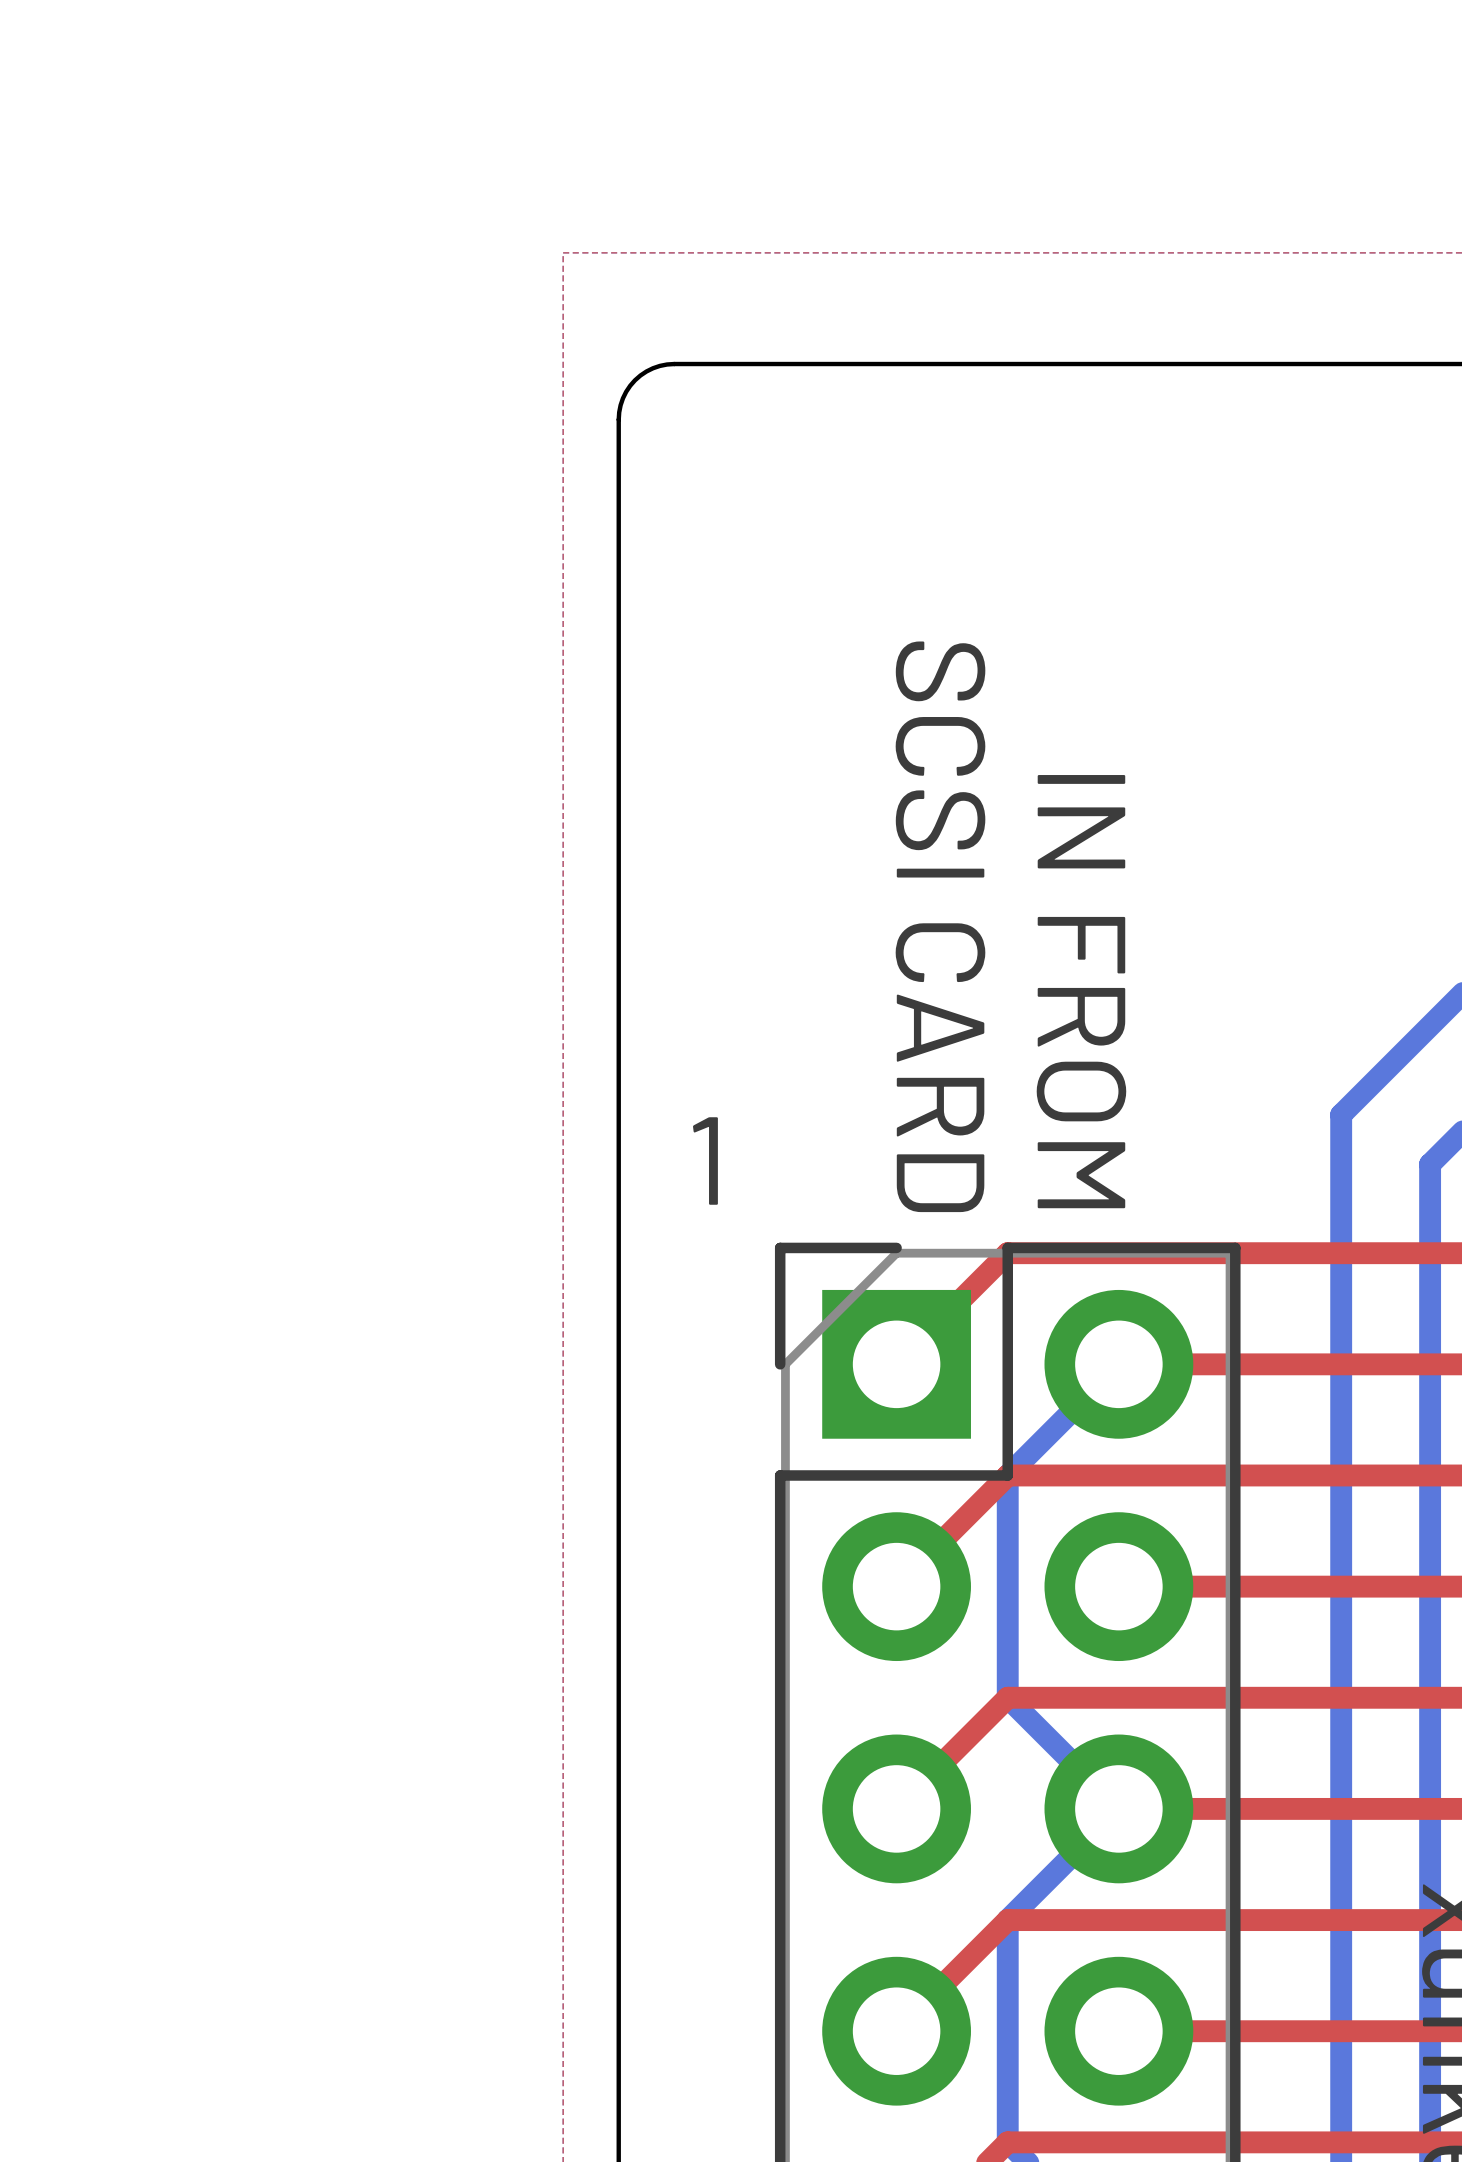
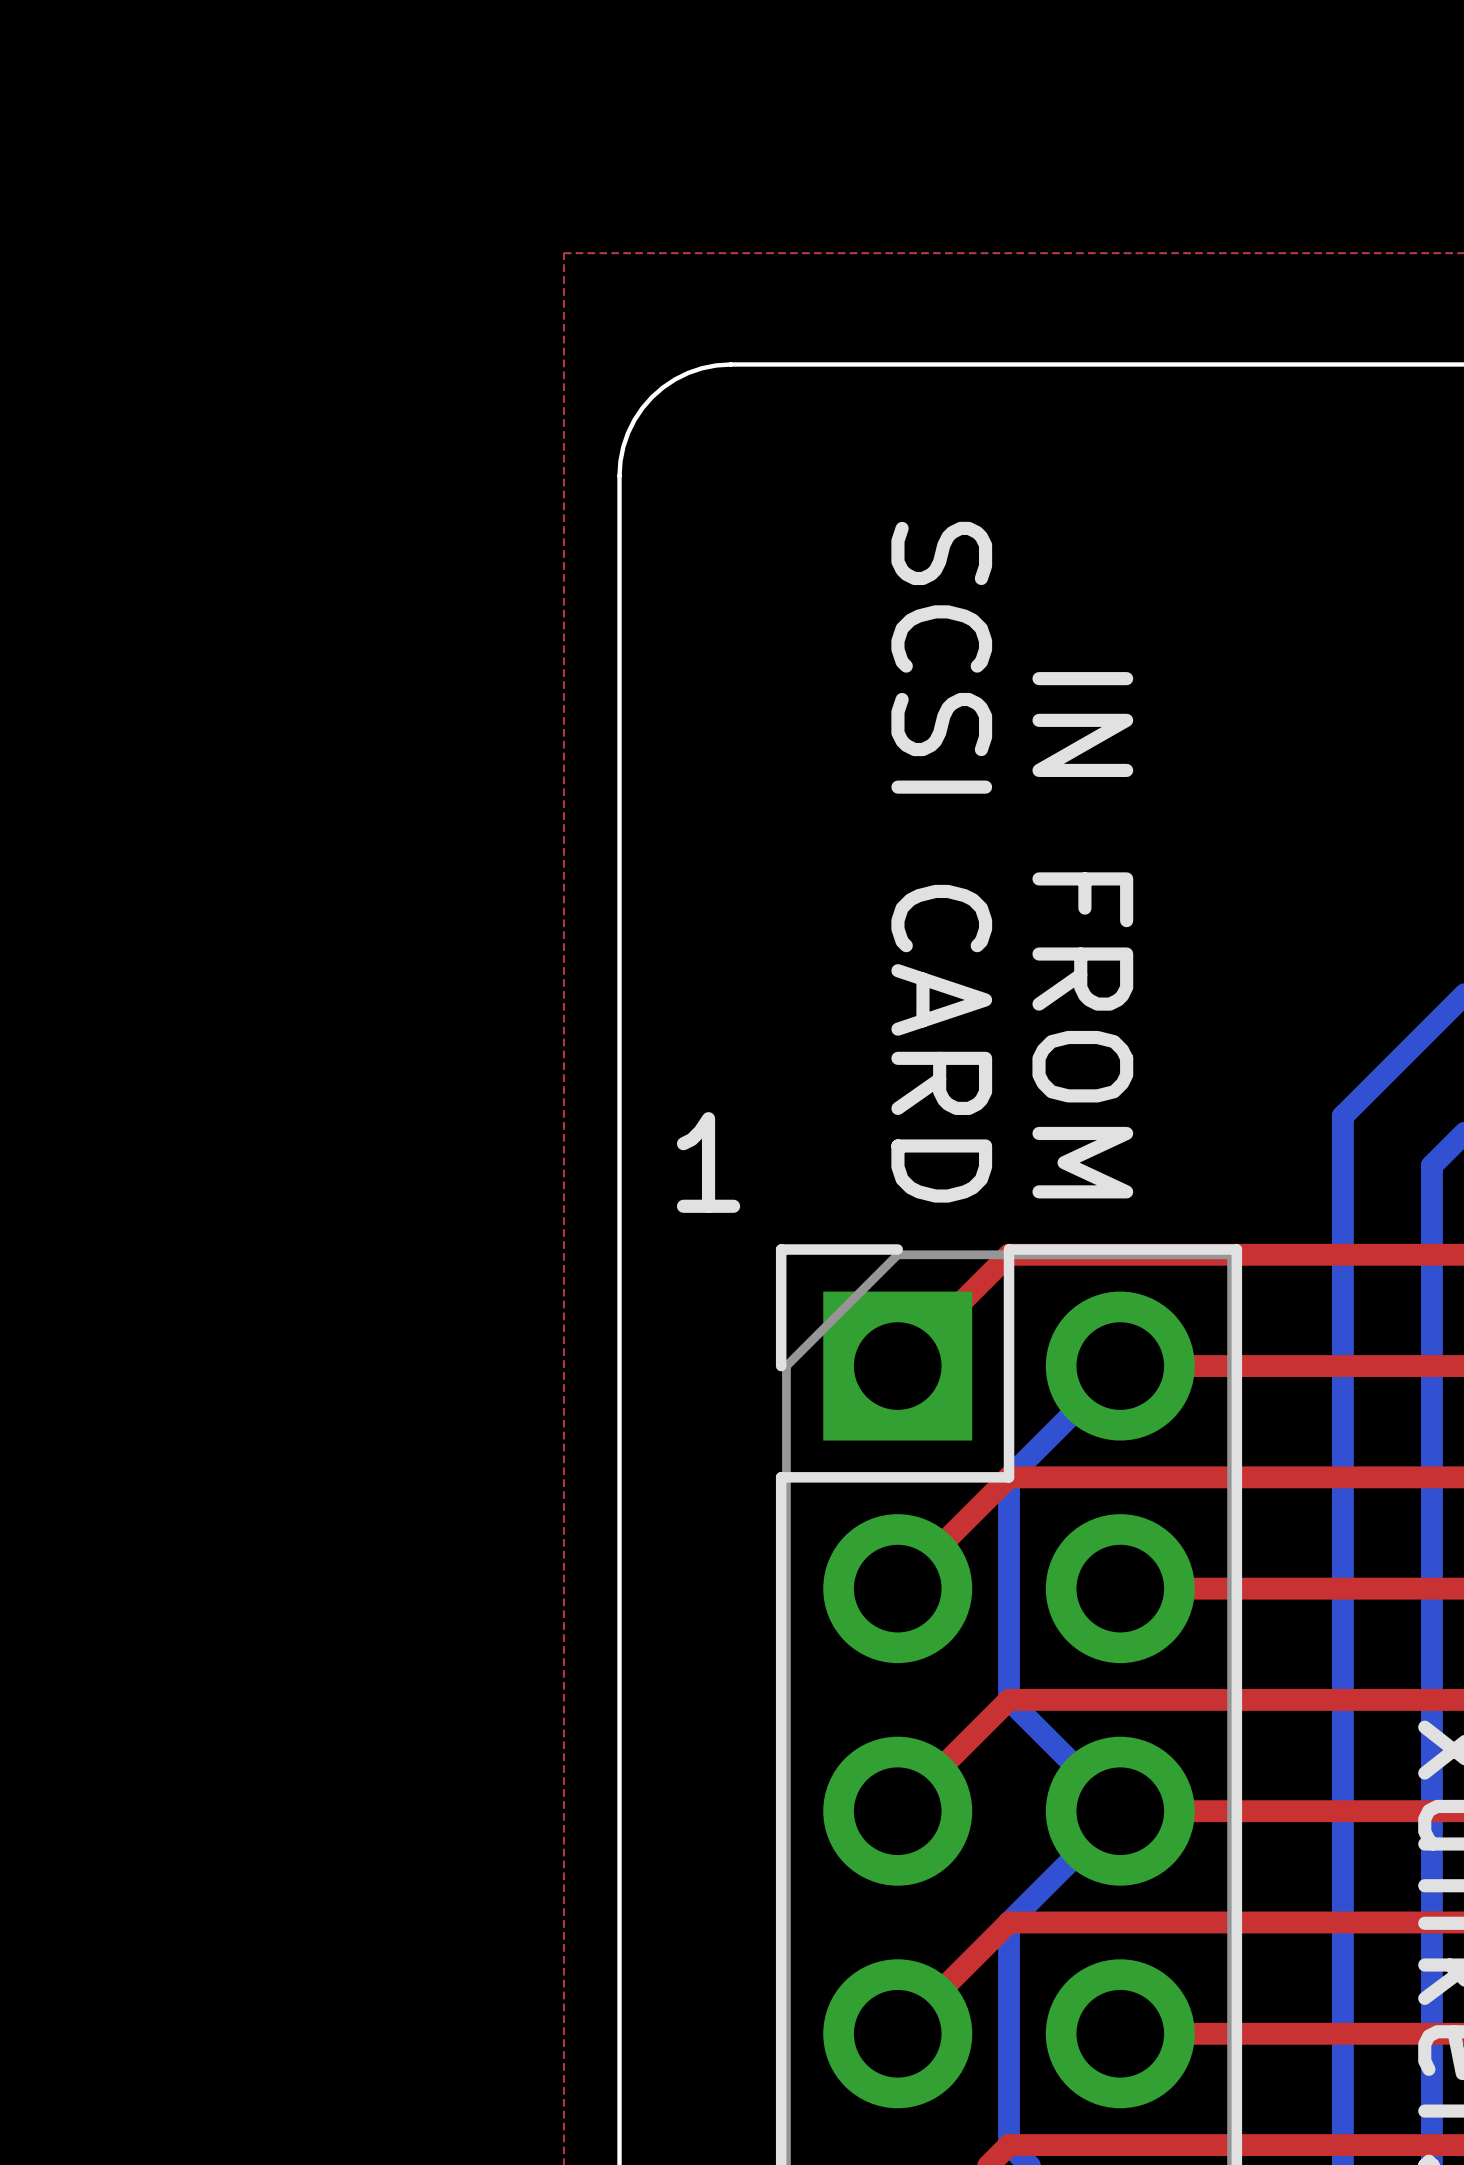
board edge: (729, 364) (667, 364) (646, 371) (635, 380) (626, 391) (620, 405) (618, 419) -> (730, 364) (701, 368) (688, 372) (675, 379) (652, 397) (634, 420) (627, 433) (620, 461) (619, 475)
board edge: (618, 419) (618, 475) -> none

